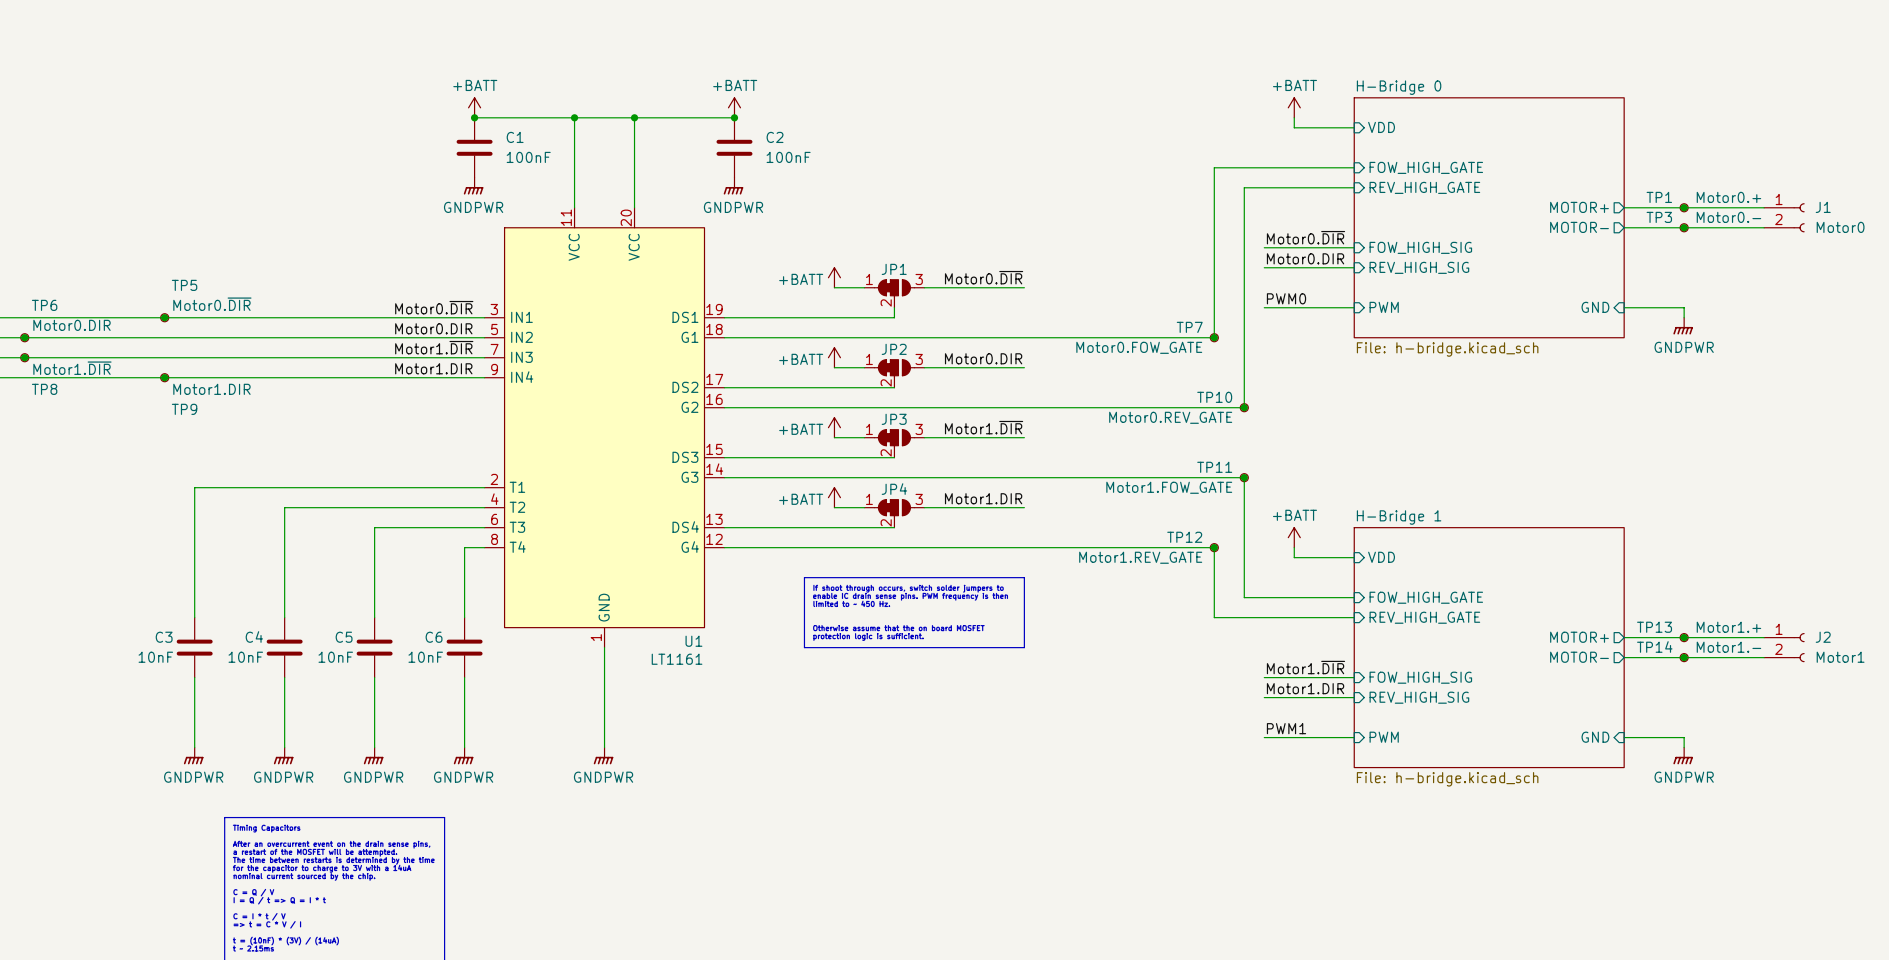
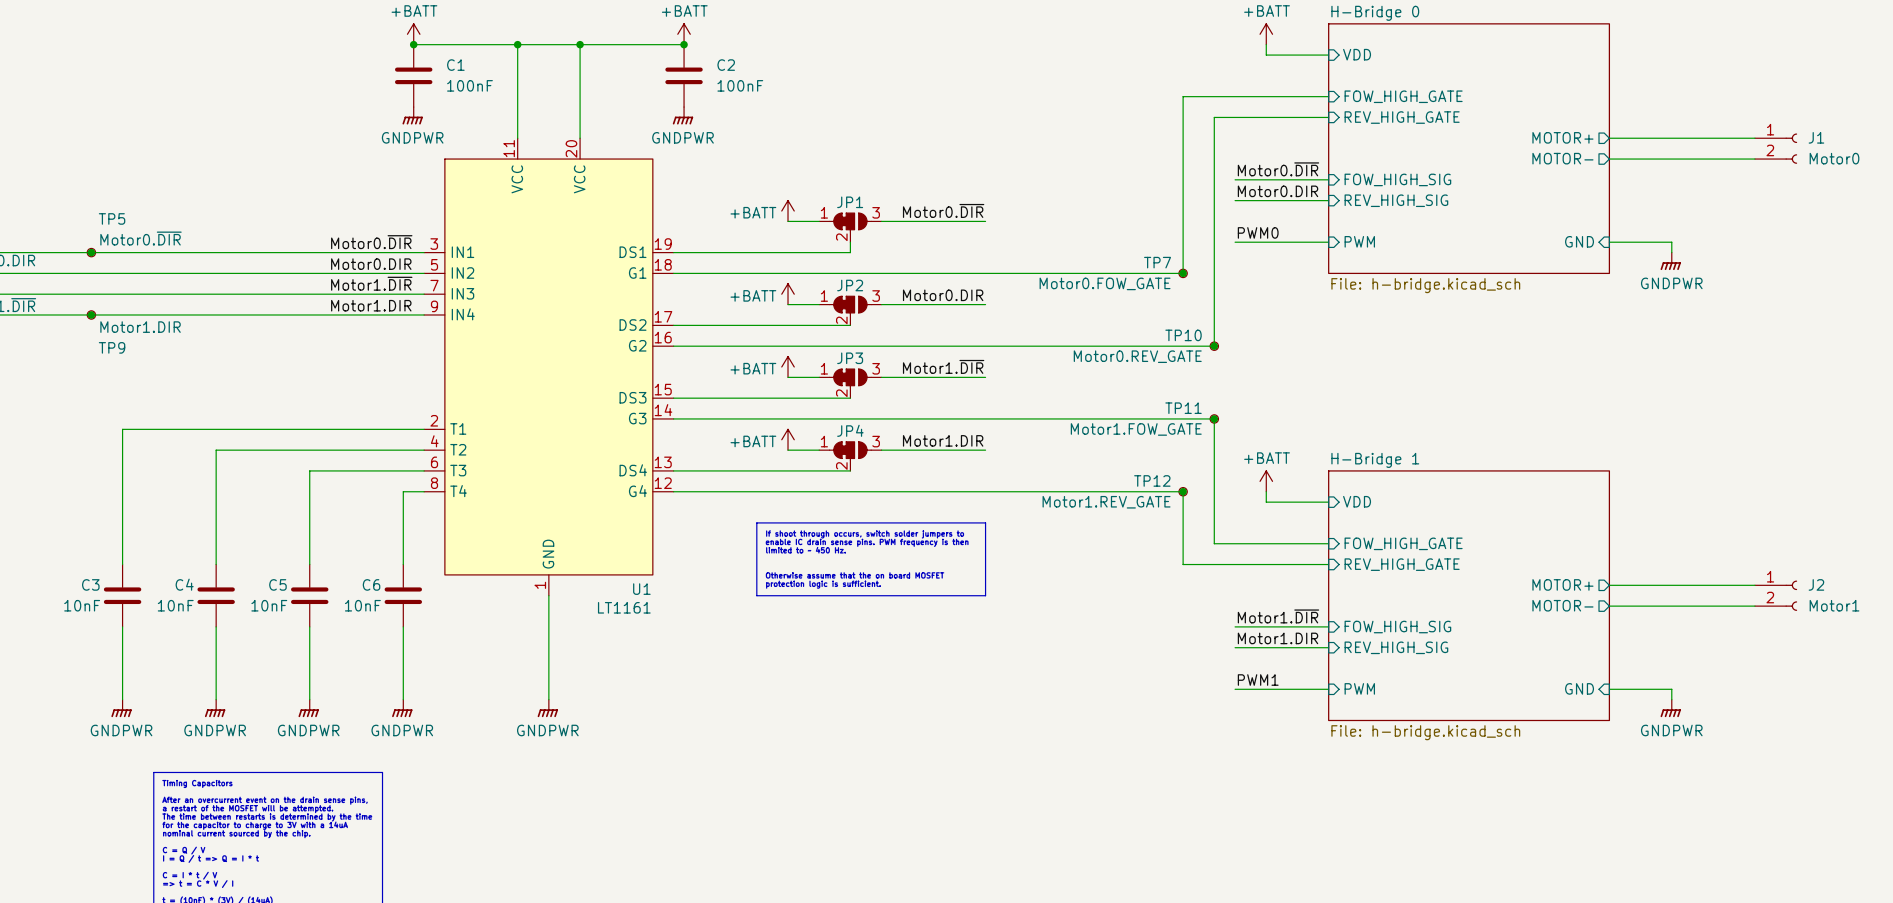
junction: (1684, 207) -> none
TP1: Motor0.+ (1684, 207) -> none
junction: (1684, 227) -> none
TP3: Motor0.- (1684, 227) -> none
junction: (1684, 637) -> none
TP13: Motor1.+ (1684, 637) -> none
junction: (1684, 657) -> none
TP14: Motor1.- (1684, 657) -> none

